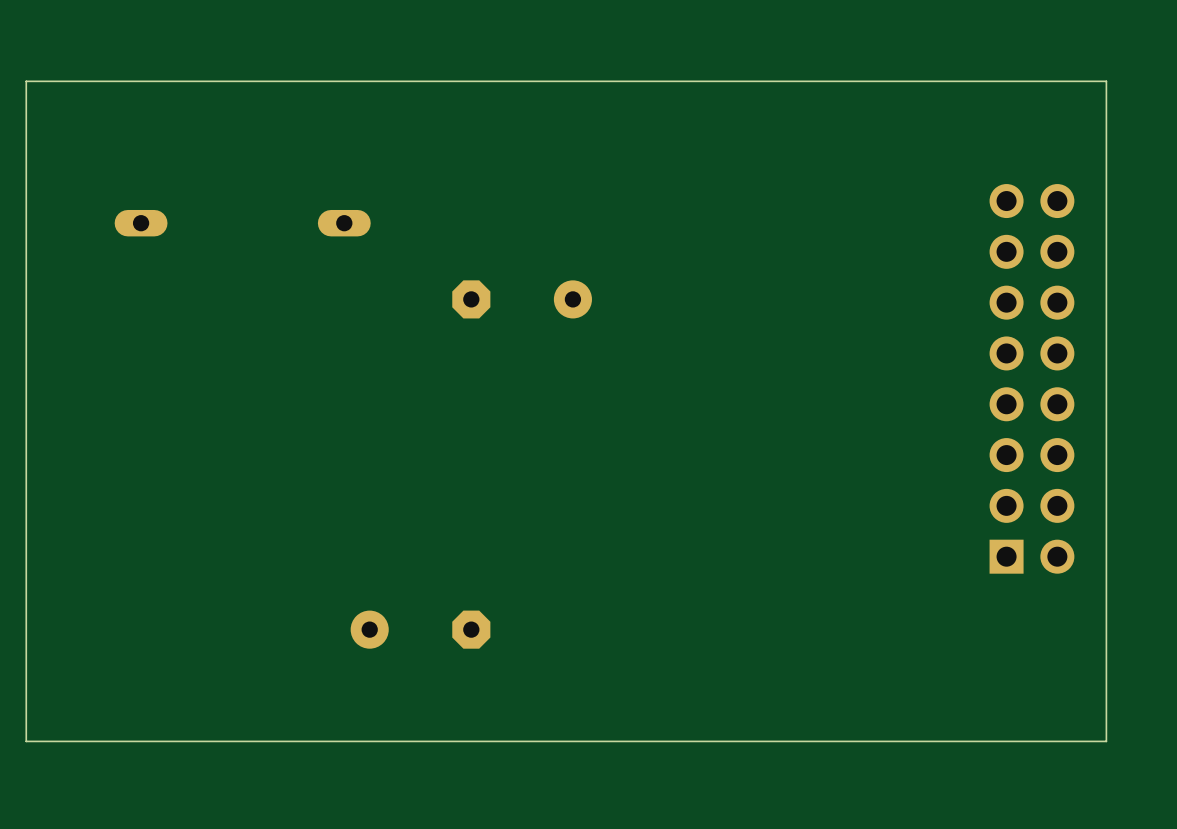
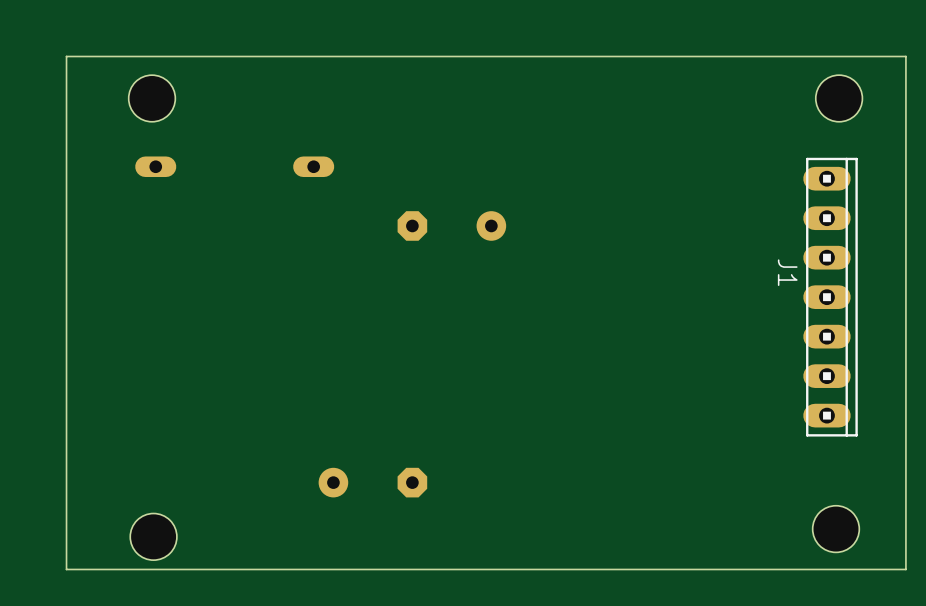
part: none -> (152, 98)
part: none -> (839, 98)
part: (1031, 378) -> none
J1: none -> (830, 297)
part: none -> (835, 529)
part: none -> (153, 536)

